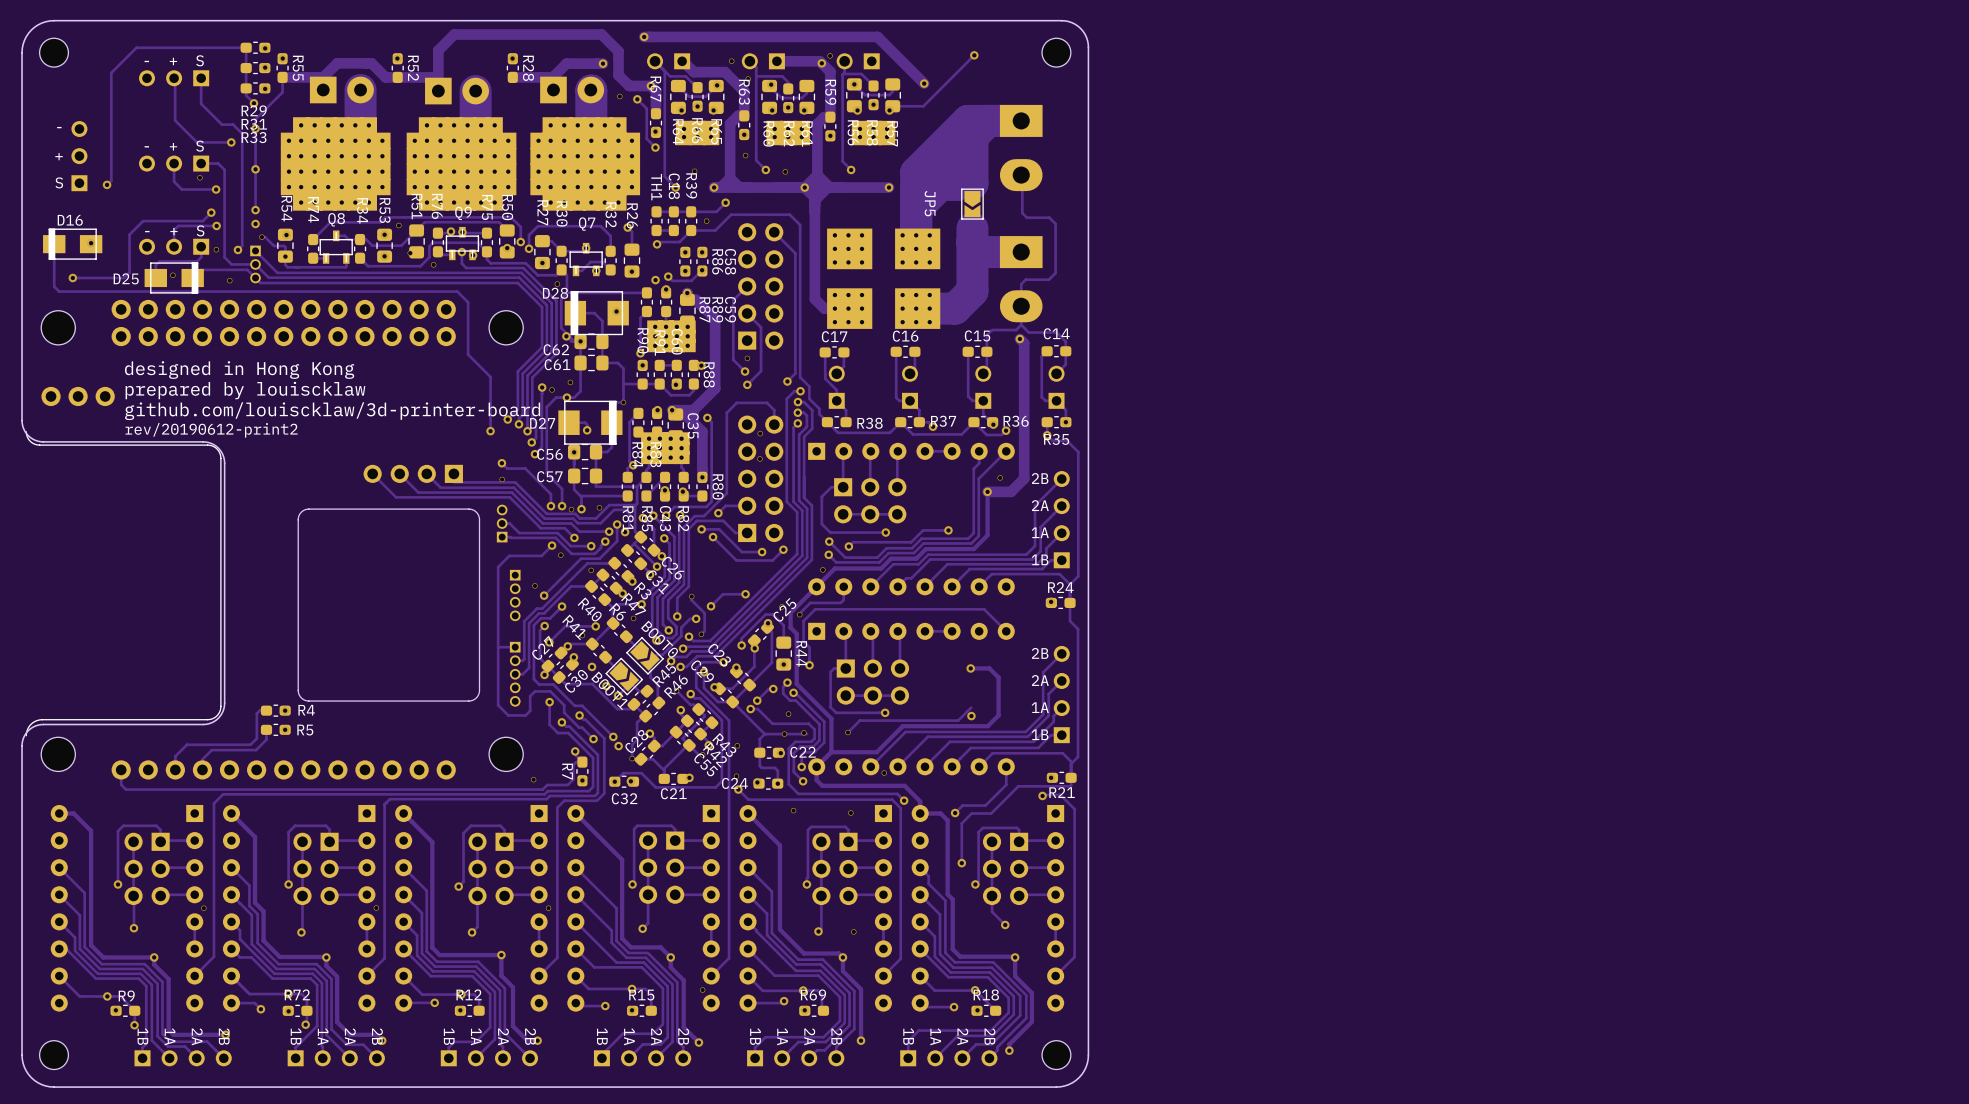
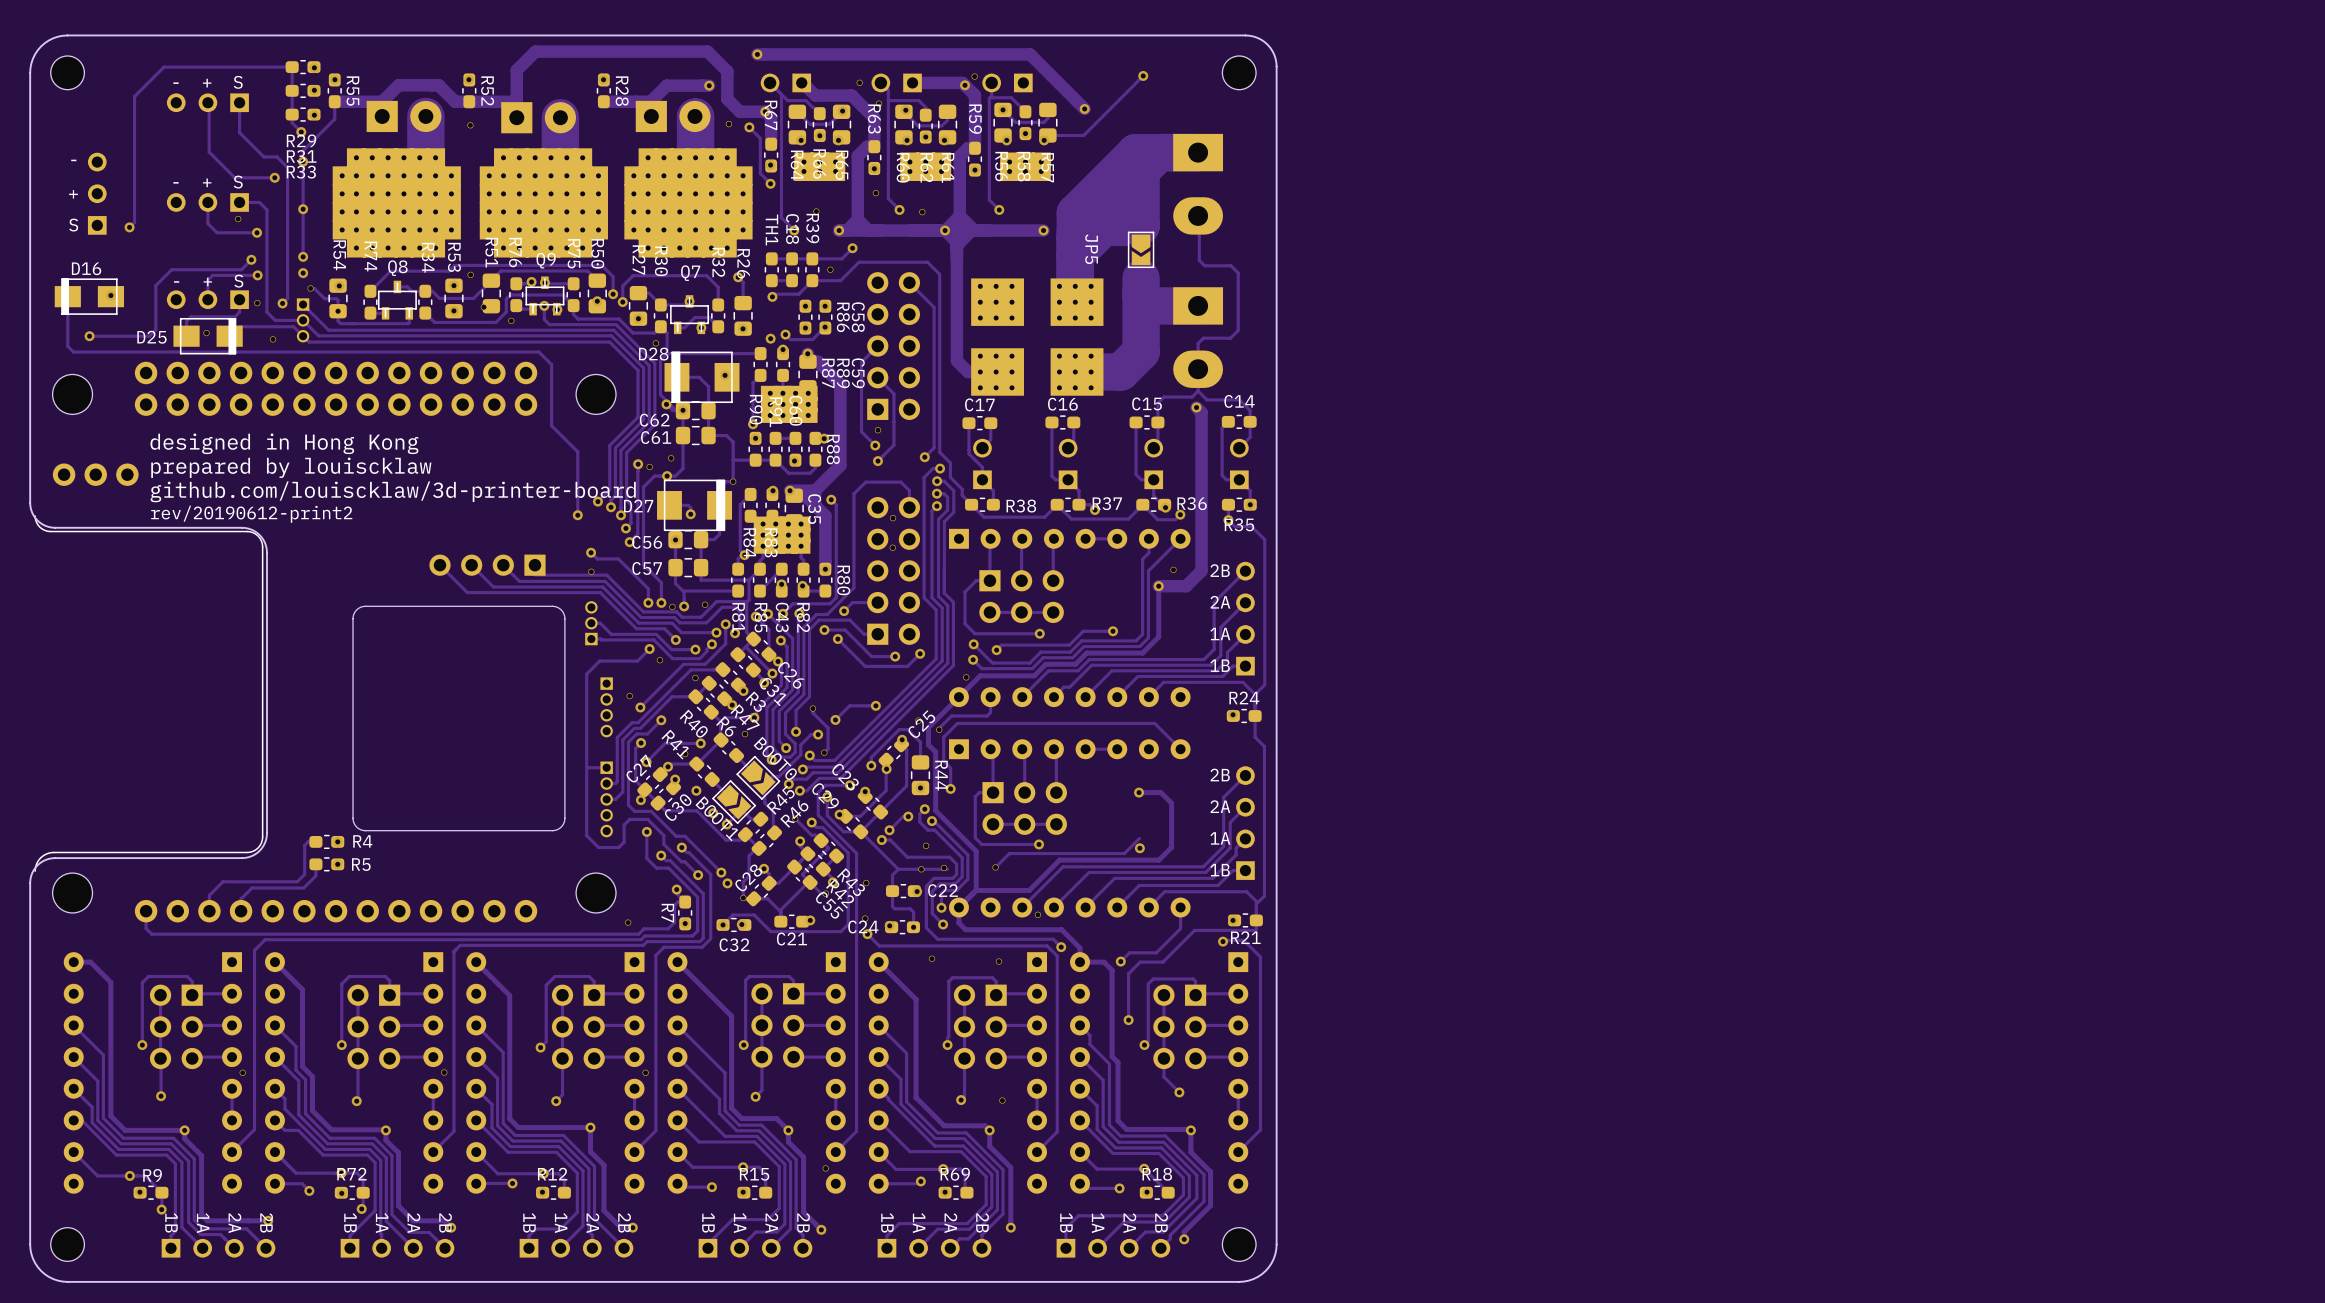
via: none -> (470, 125)

